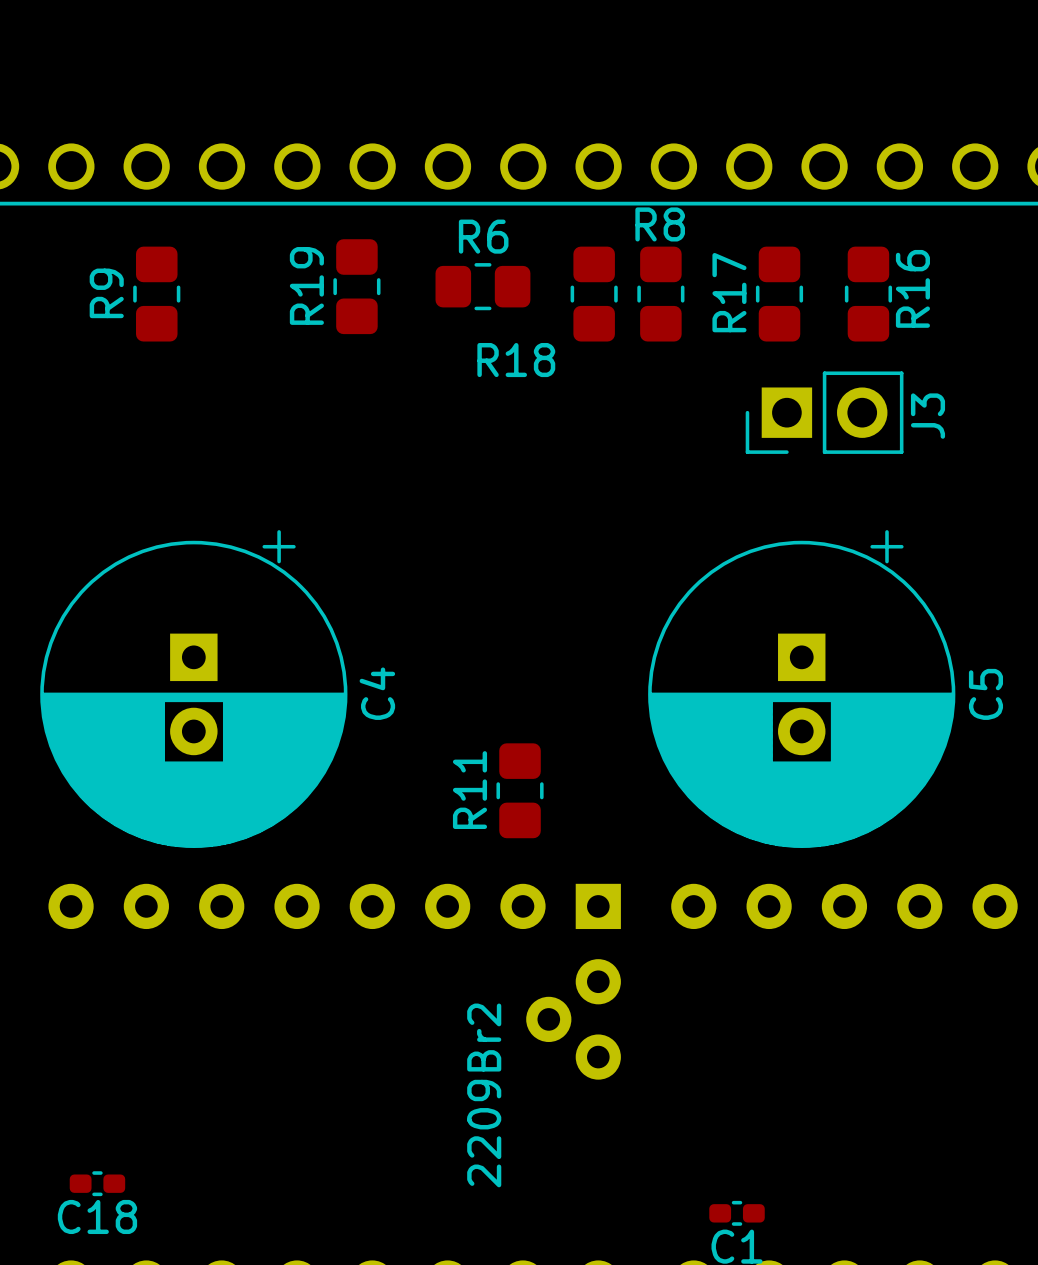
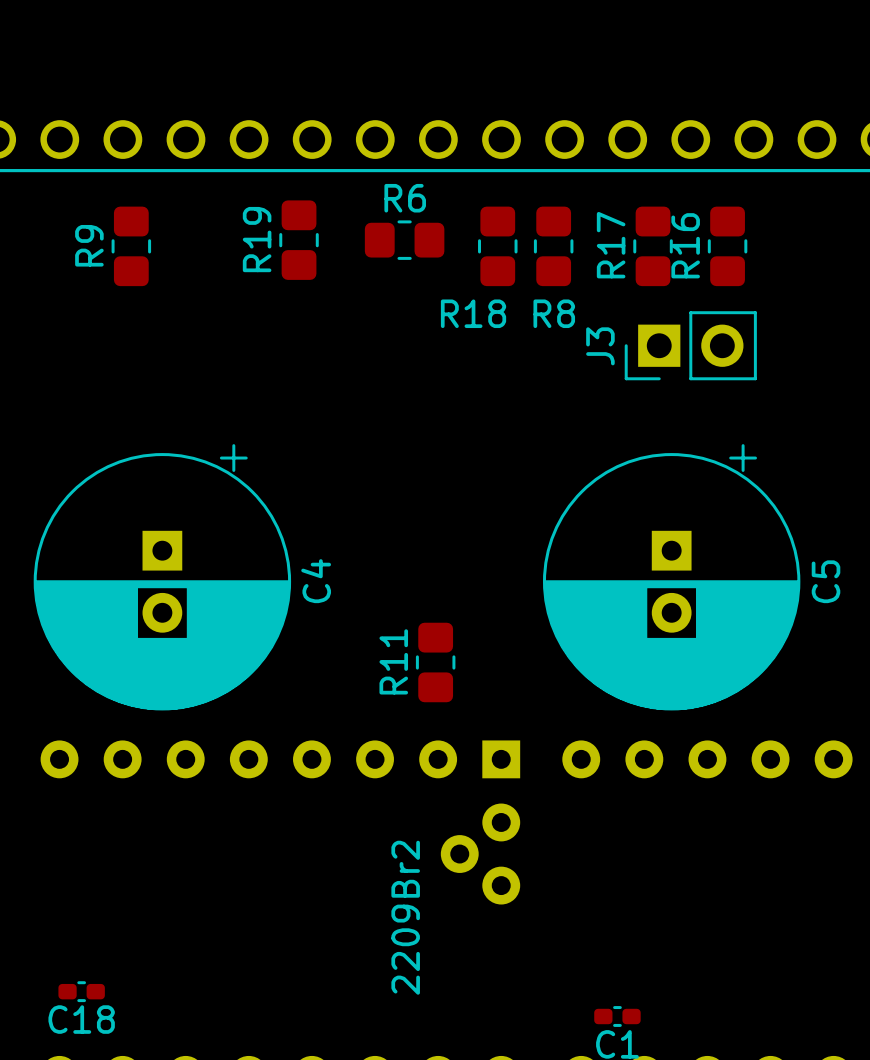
R8 name position: R8 (660, 224) -> R8 (554, 313)
R16 name position: R16 (912, 288) -> R16 (685, 245)
R18 name position: R18 (516, 360) -> R18 (473, 313)
J3 name position: J3 (928, 416) -> J3 (600, 346)

